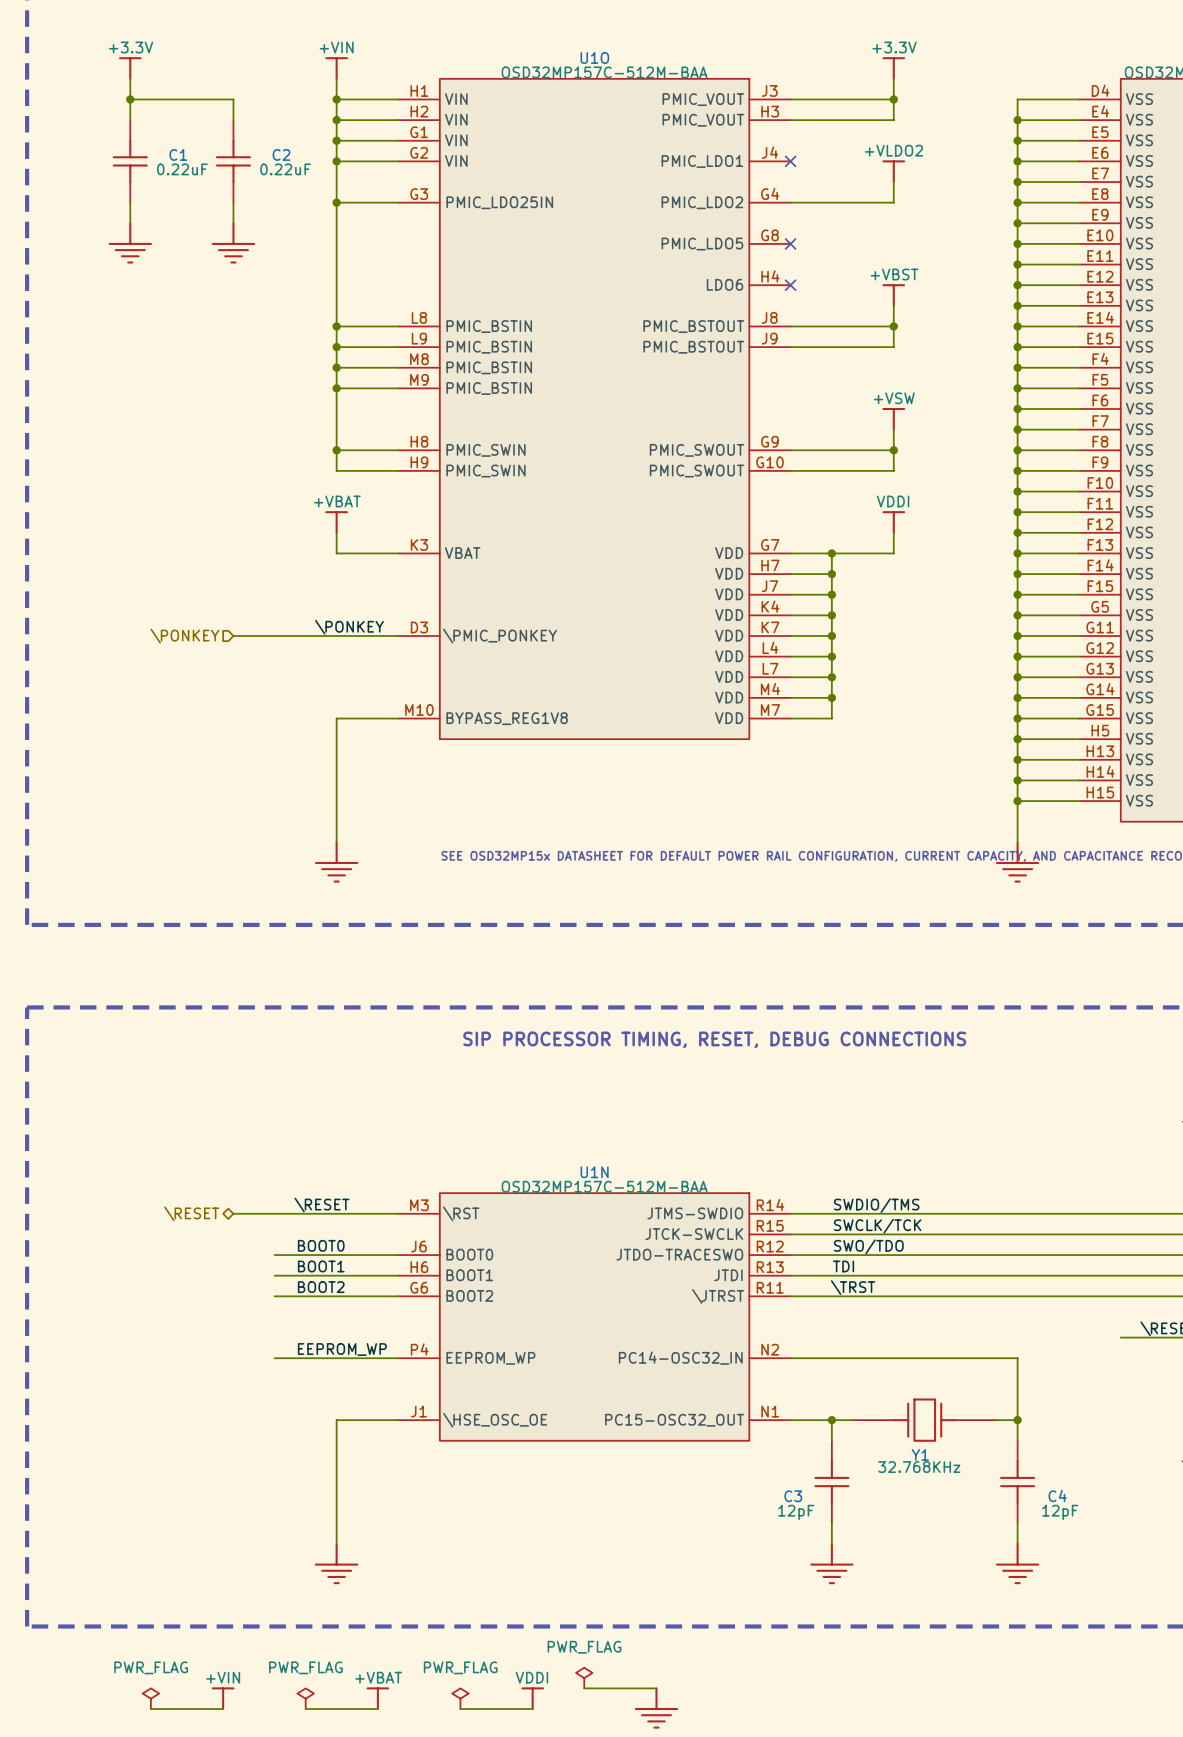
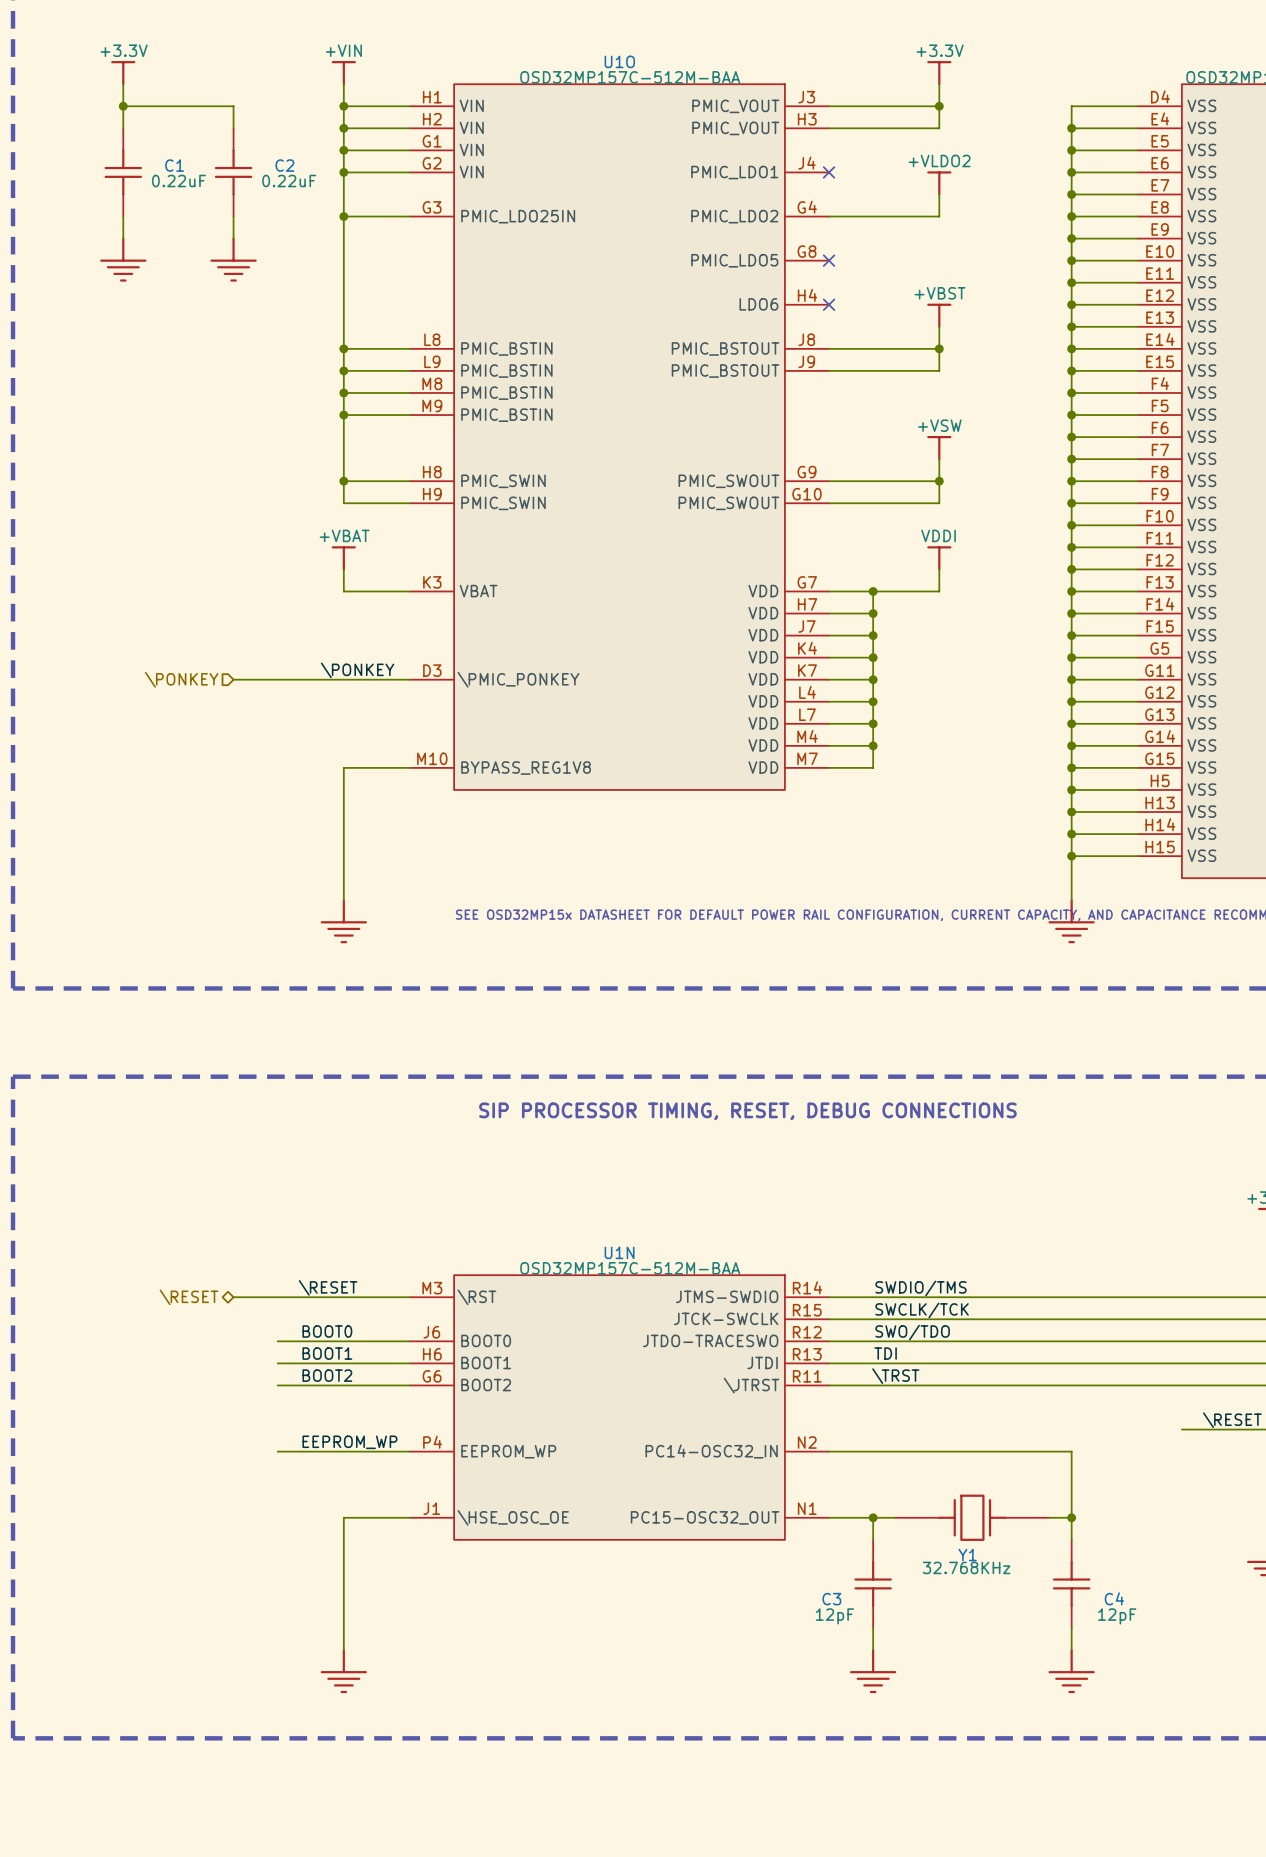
power symbol: PWR_FLAG (584, 1678) -> none
wire: (584, 1688) (656, 1688) -> none
power symbol: PWR_FLAG (150, 1698) -> none
power symbol: +VIN (223, 1698) -> none
power symbol: PWR_FLAG (305, 1698) -> none
power symbol: +VBAT (377, 1698) -> none
power symbol: PWR_FLAG (460, 1698) -> none
power symbol: VDDI (532, 1698) -> none
power symbol: (656, 1707) -> none
wire: (150, 1709) (223, 1709) -> none
wire: (305, 1709) (377, 1709) -> none
wire: (460, 1709) (532, 1709) -> none

